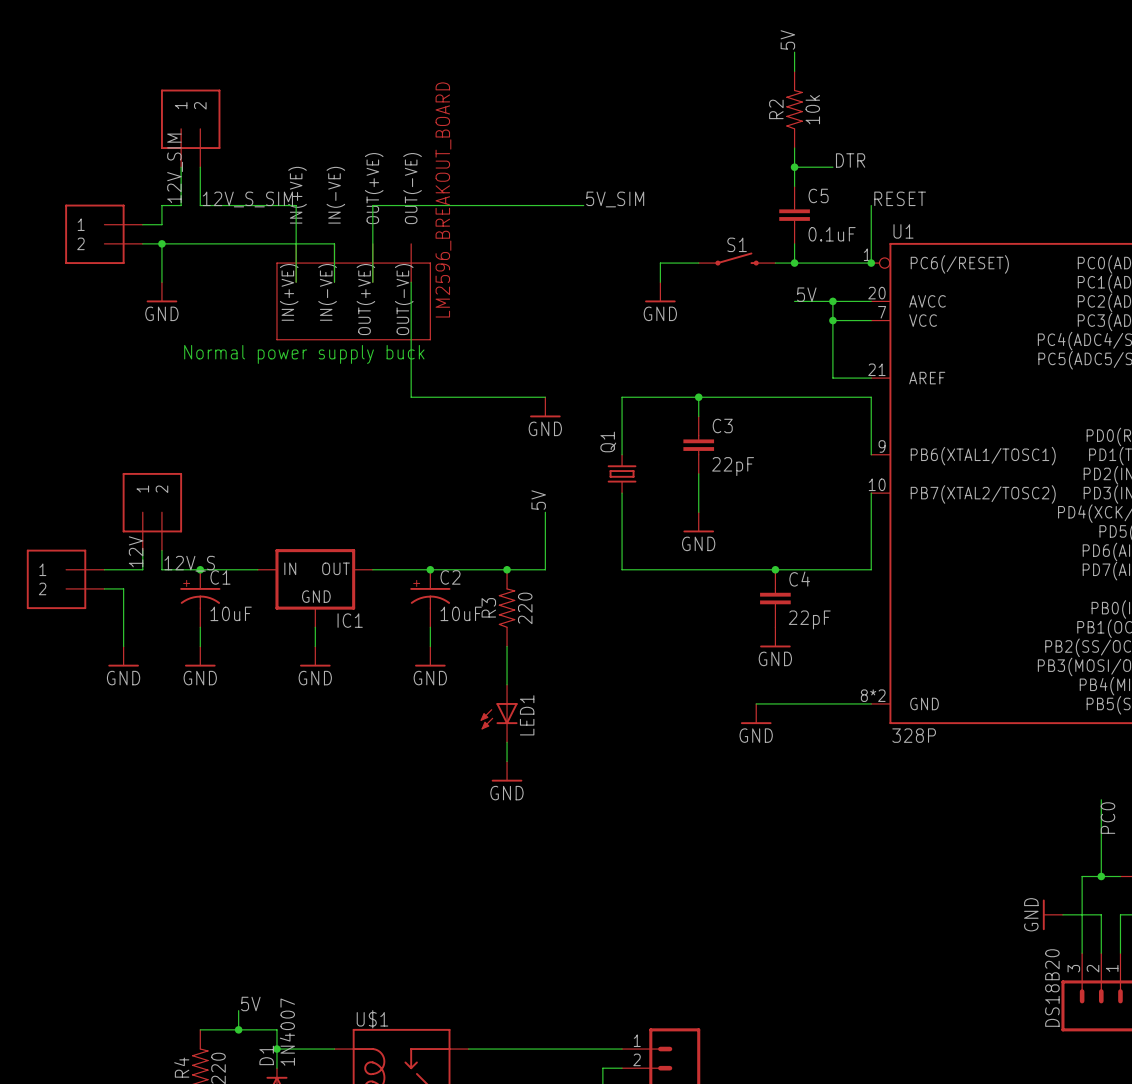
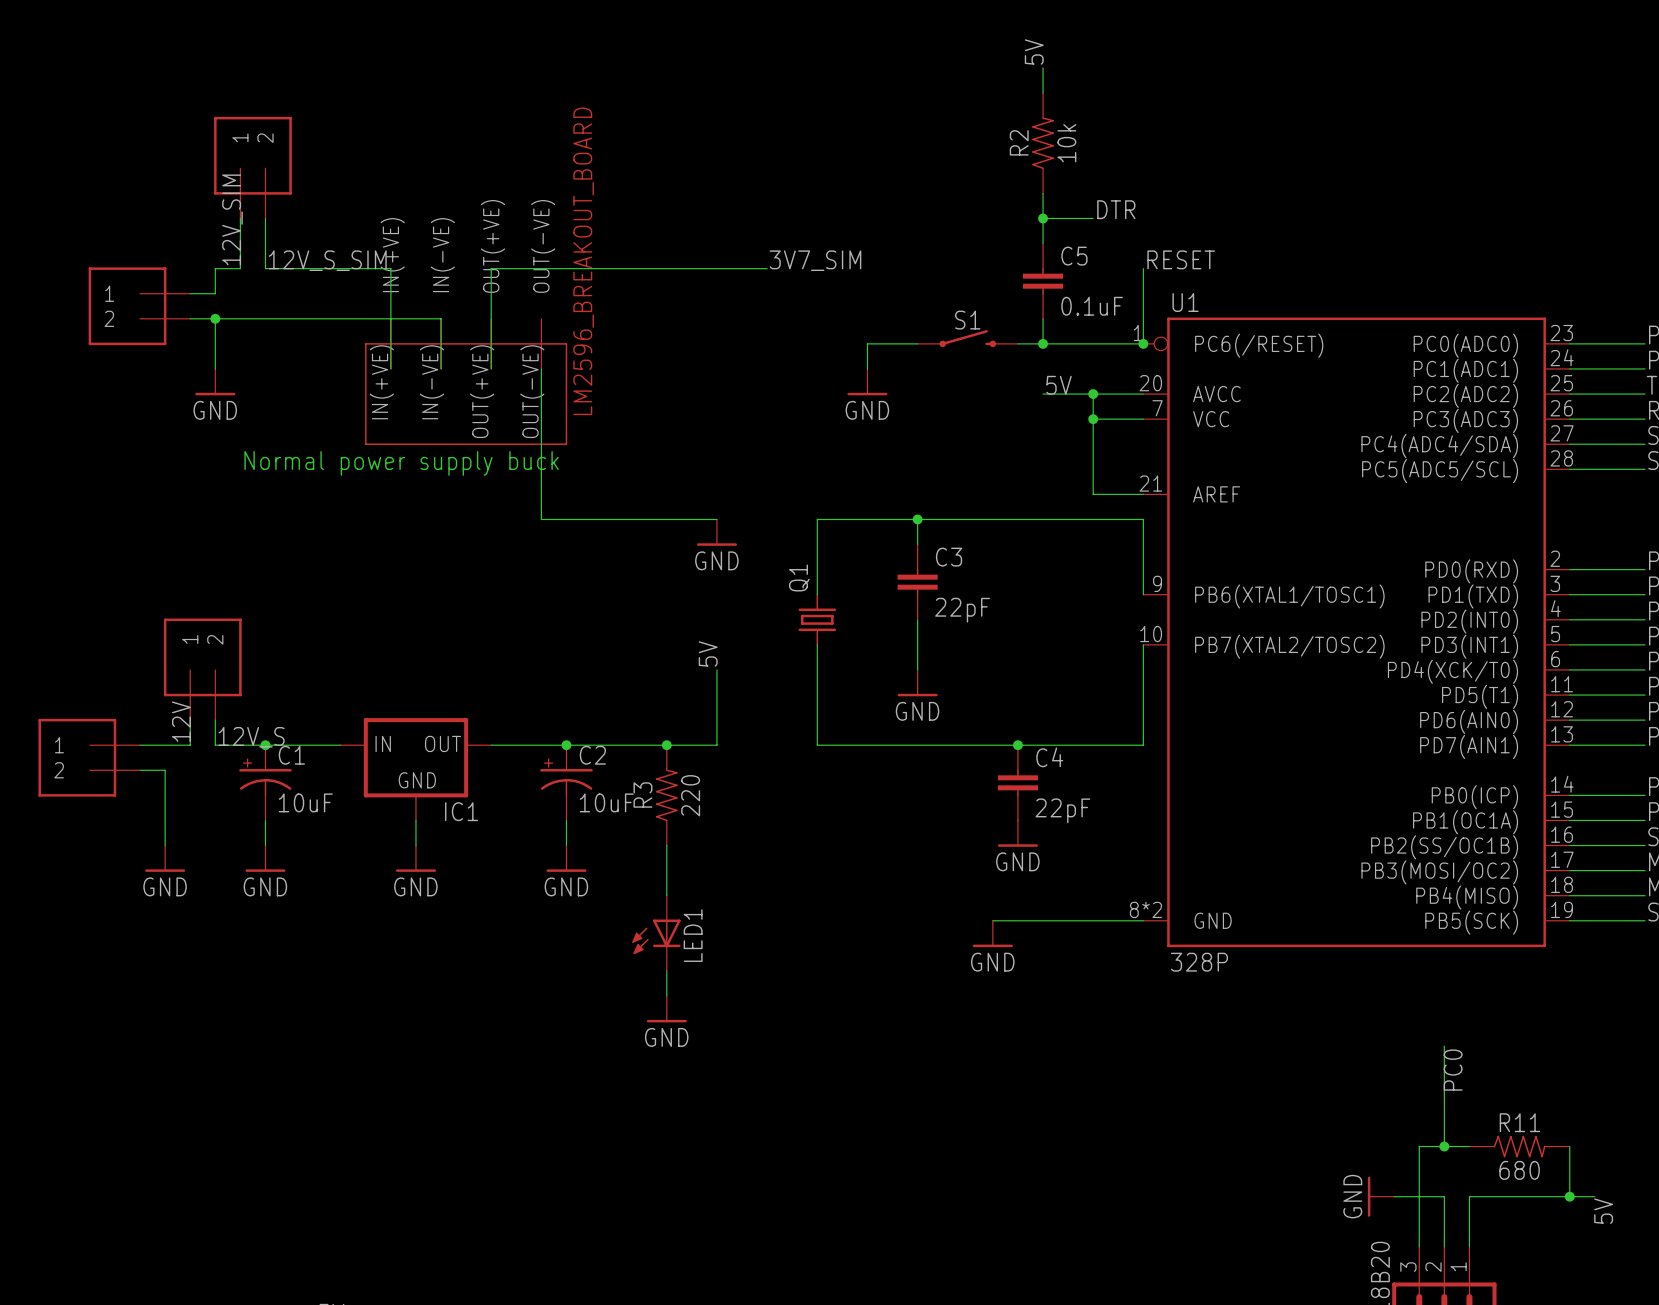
label: 5V_SIM (615, 199) -> 3V7_SIM (815, 260)

